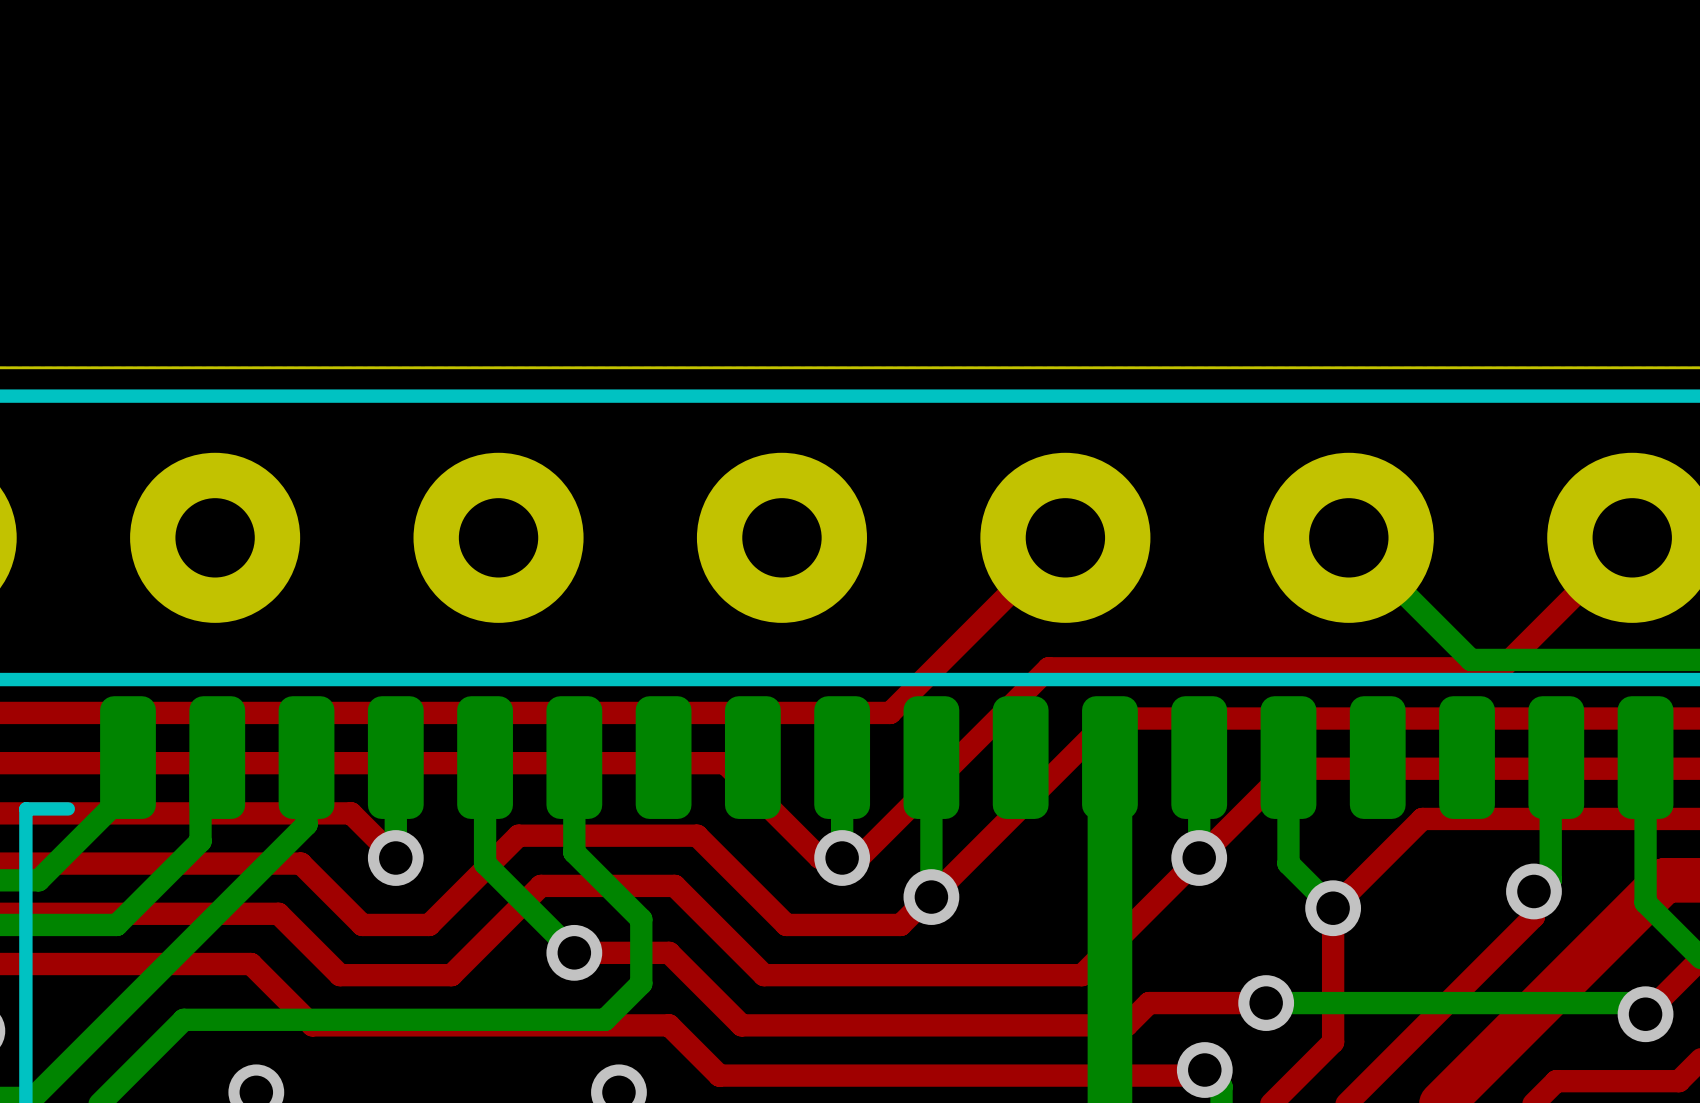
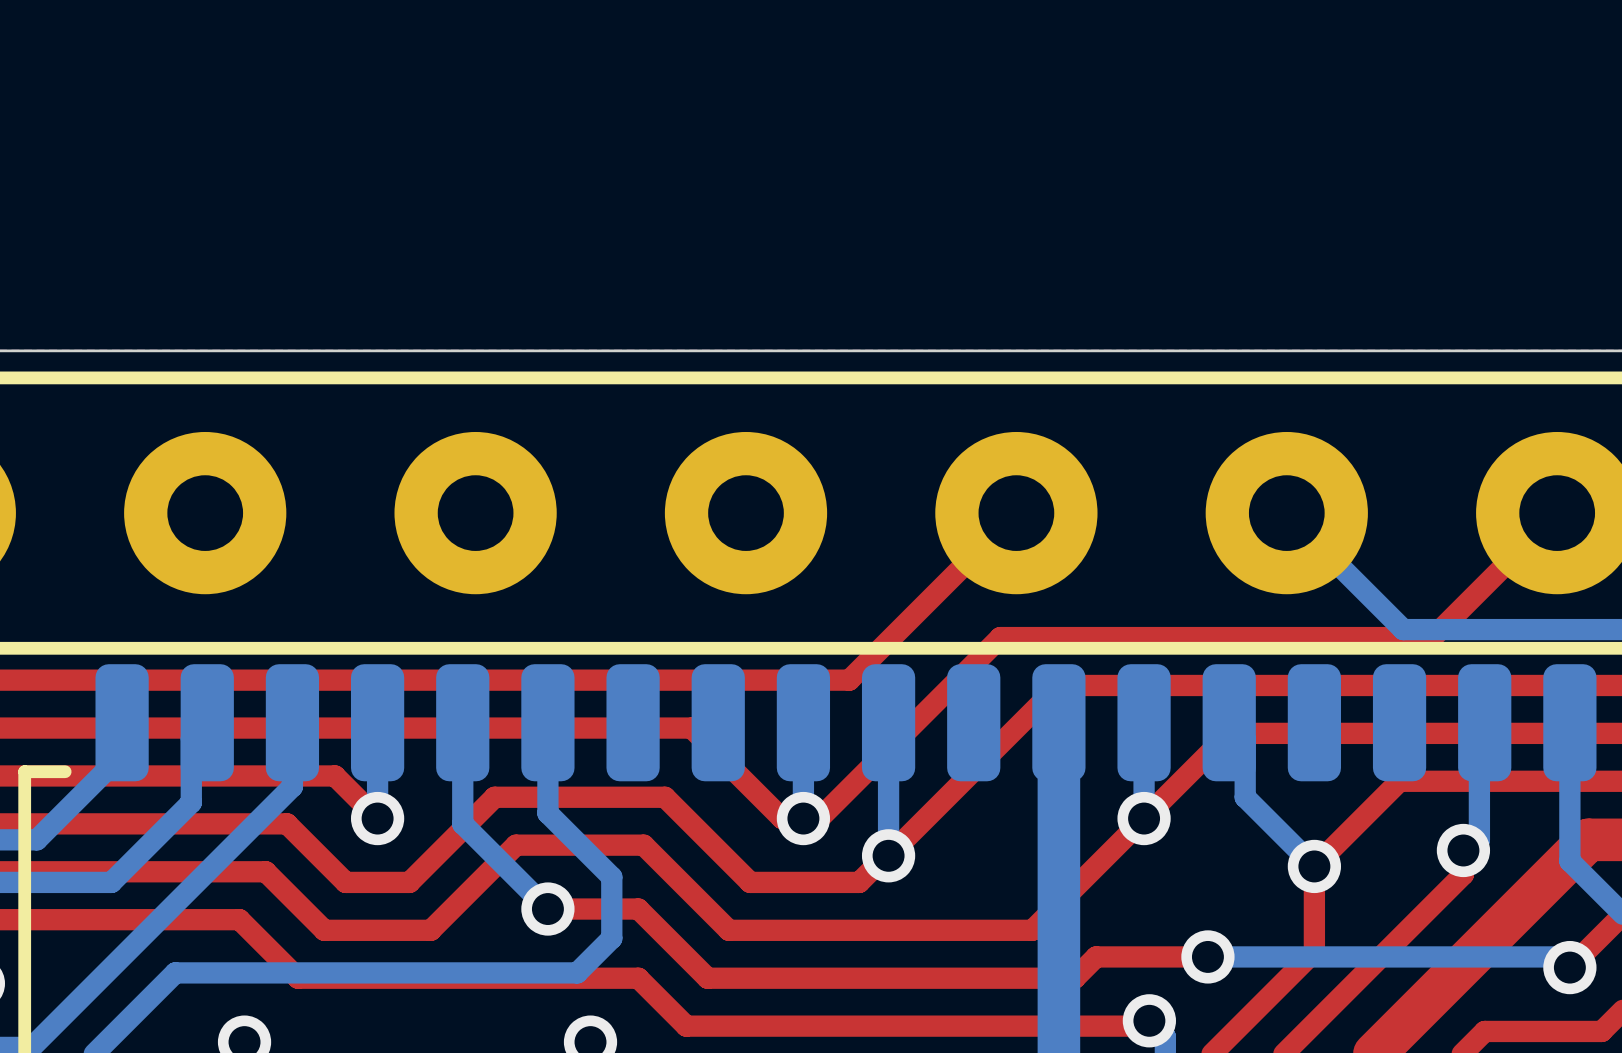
bottom track: (1288, 757) (1288, 863) (1333, 908) -> (1229, 722) (1245, 738) (1245, 797) (1314, 866)
top track: (1467, 818) (1422, 818) (1333, 908) (1333, 1042) -> (1399, 781) (1314, 866) (1314, 951) (1271, 994)
via position: (1333, 908) -> (1314, 866)

